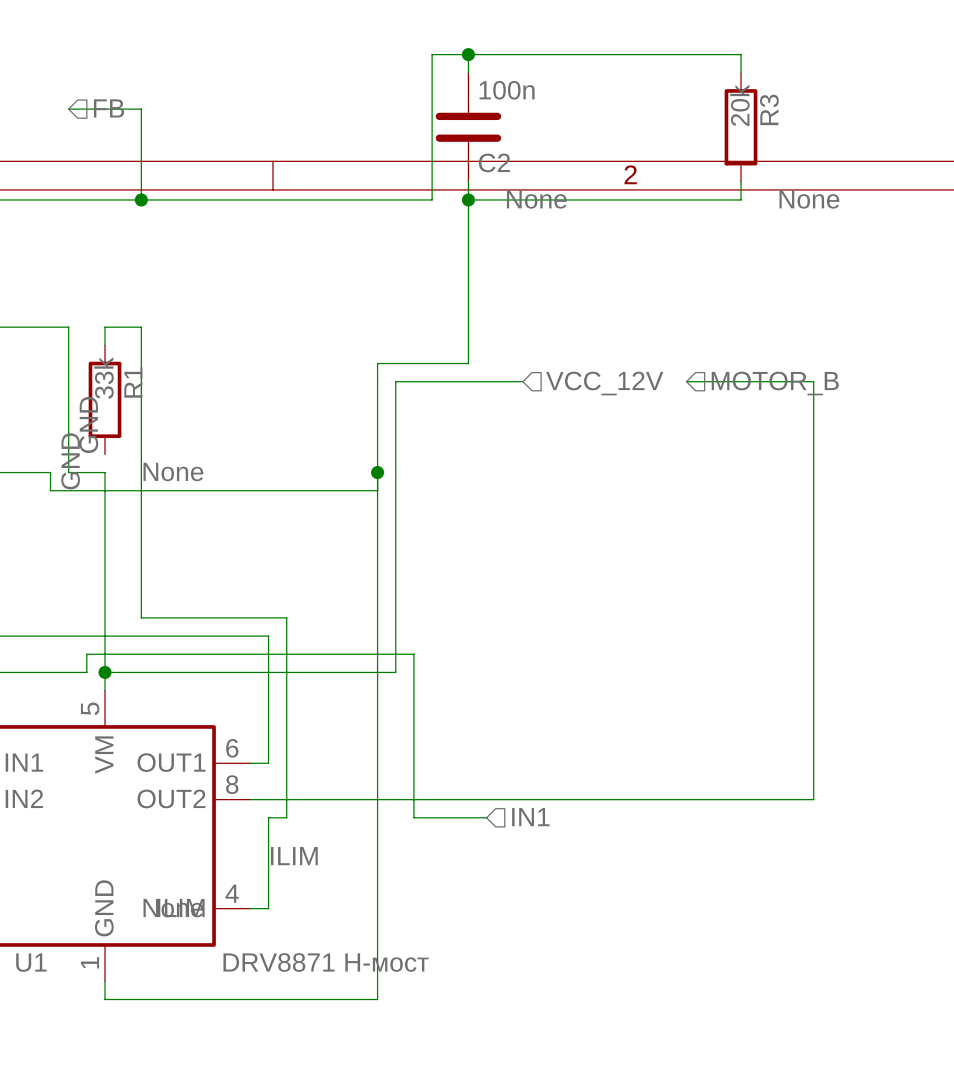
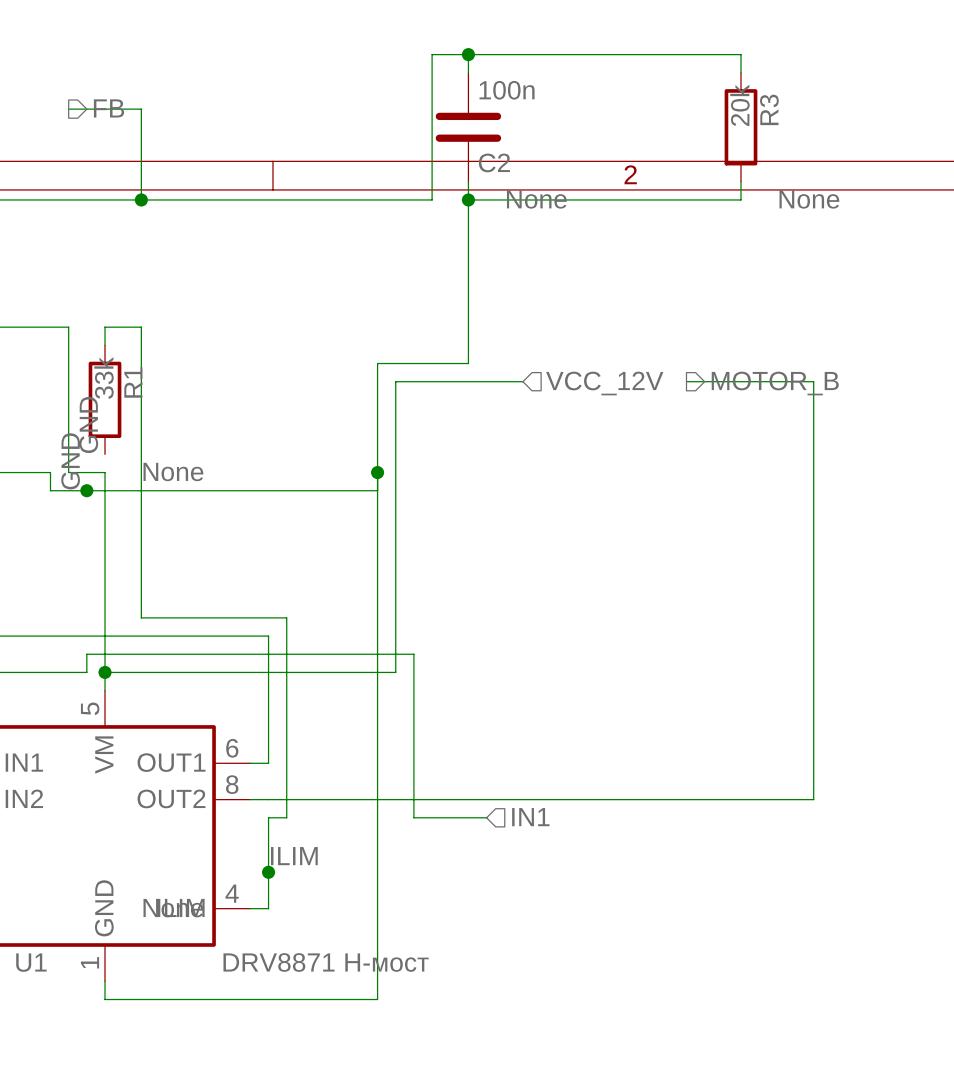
hierarchical label shape: input (109, 108) -> output (109, 108)
hierarchical label shape: input (775, 383) -> output (775, 383)
junction: none -> (86, 490)
junction: none -> (268, 872)

